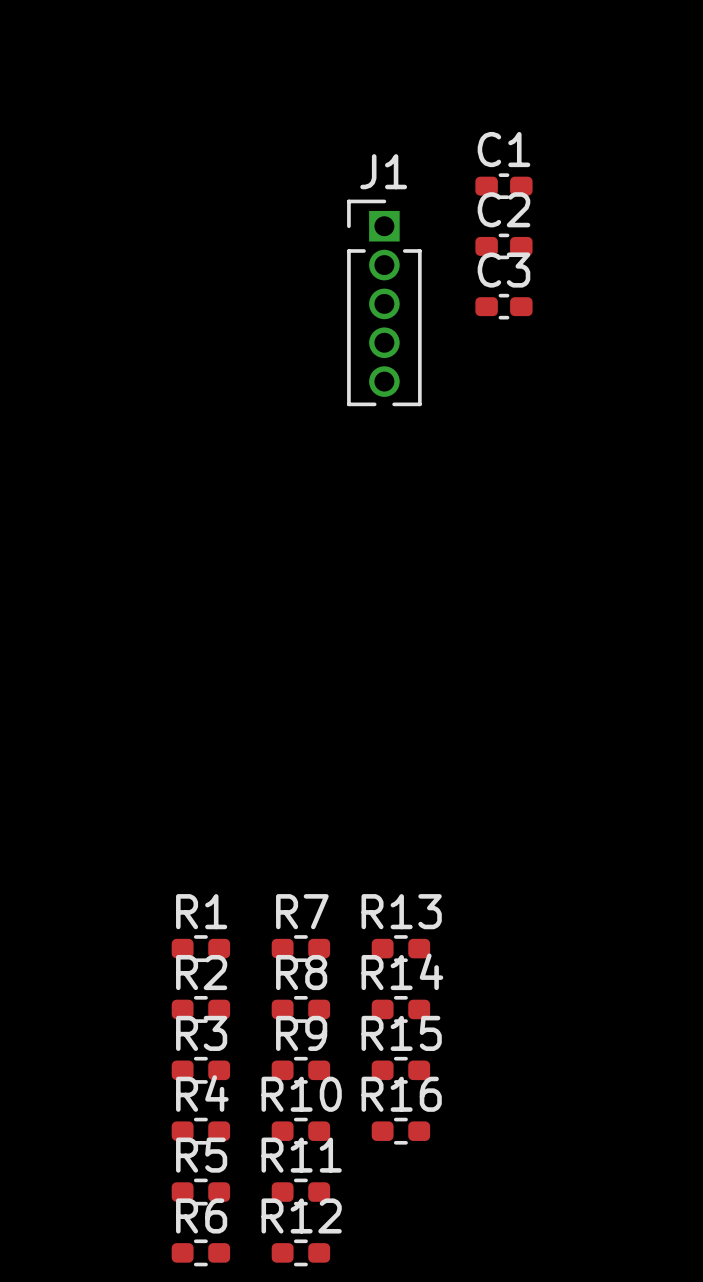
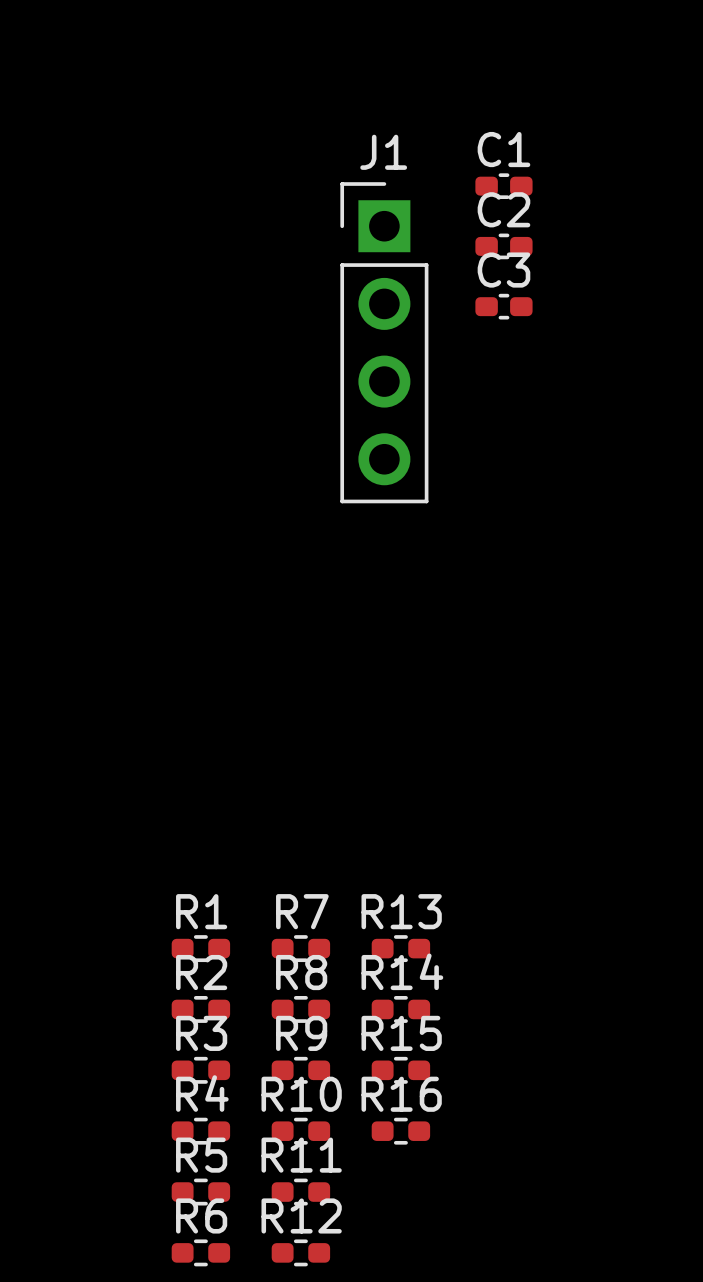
J1 footprint: [347, 199, 422, 407] -> [340, 182, 429, 504]

